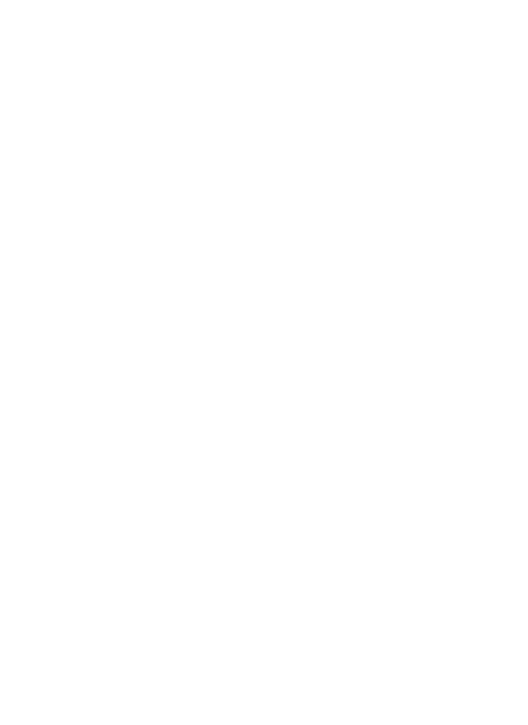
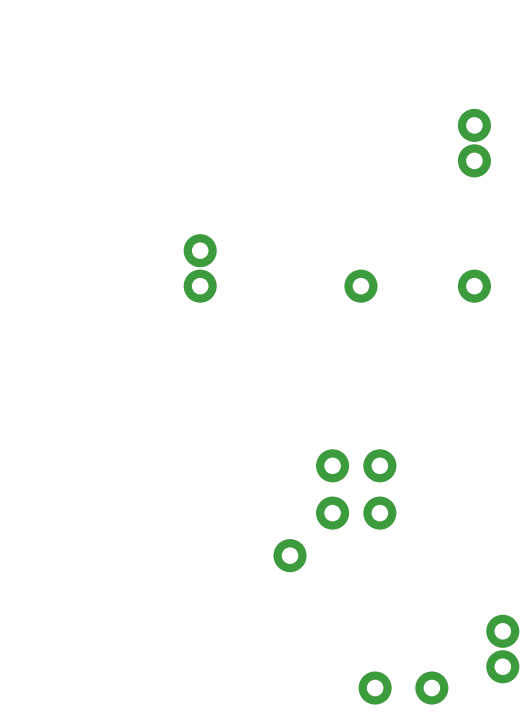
part: none -> (474, 125)
part: none -> (474, 160)
part: none -> (200, 250)
part: none -> (200, 286)
part: none -> (360, 286)
part: none -> (474, 286)
part: none -> (332, 465)
part: none -> (379, 465)
part: none -> (332, 513)
part: none -> (379, 513)
part: none -> (290, 555)
part: none -> (502, 631)
part: none -> (502, 666)
part: none -> (375, 688)
part: none -> (431, 688)

